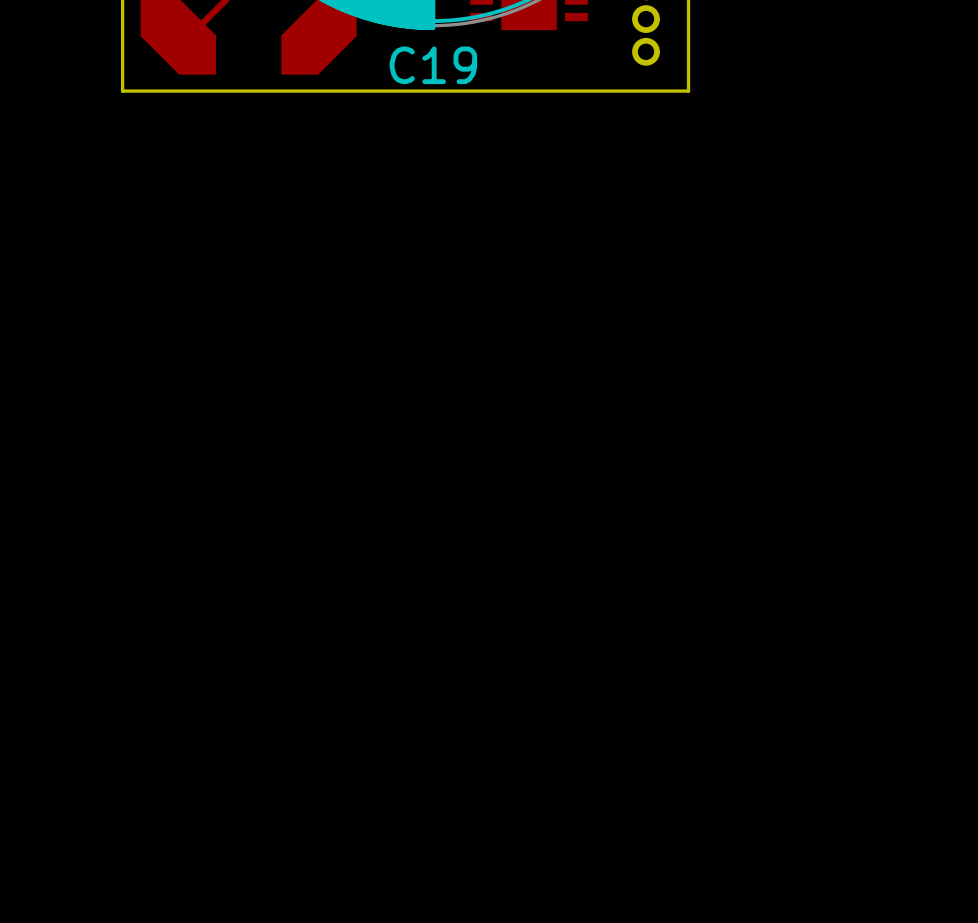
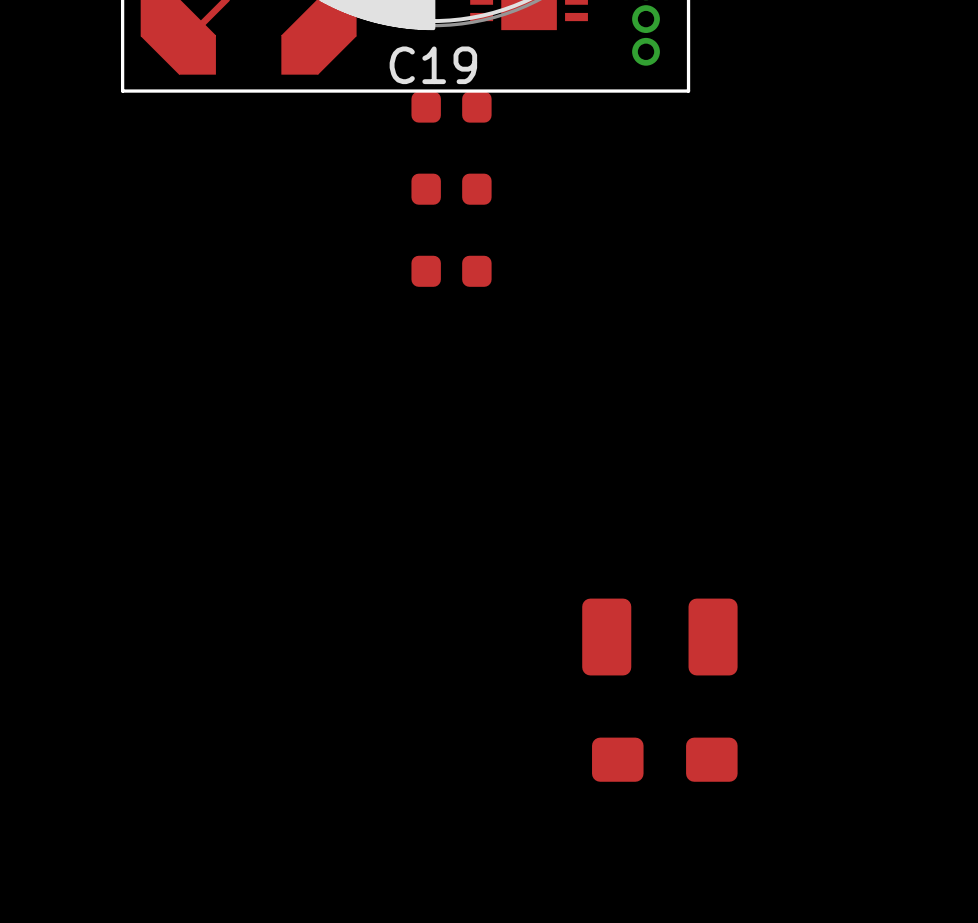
part: none -> (451, 107)
part: none -> (451, 189)
part: none -> (451, 271)
part: none -> (659, 637)
part: none -> (664, 759)

